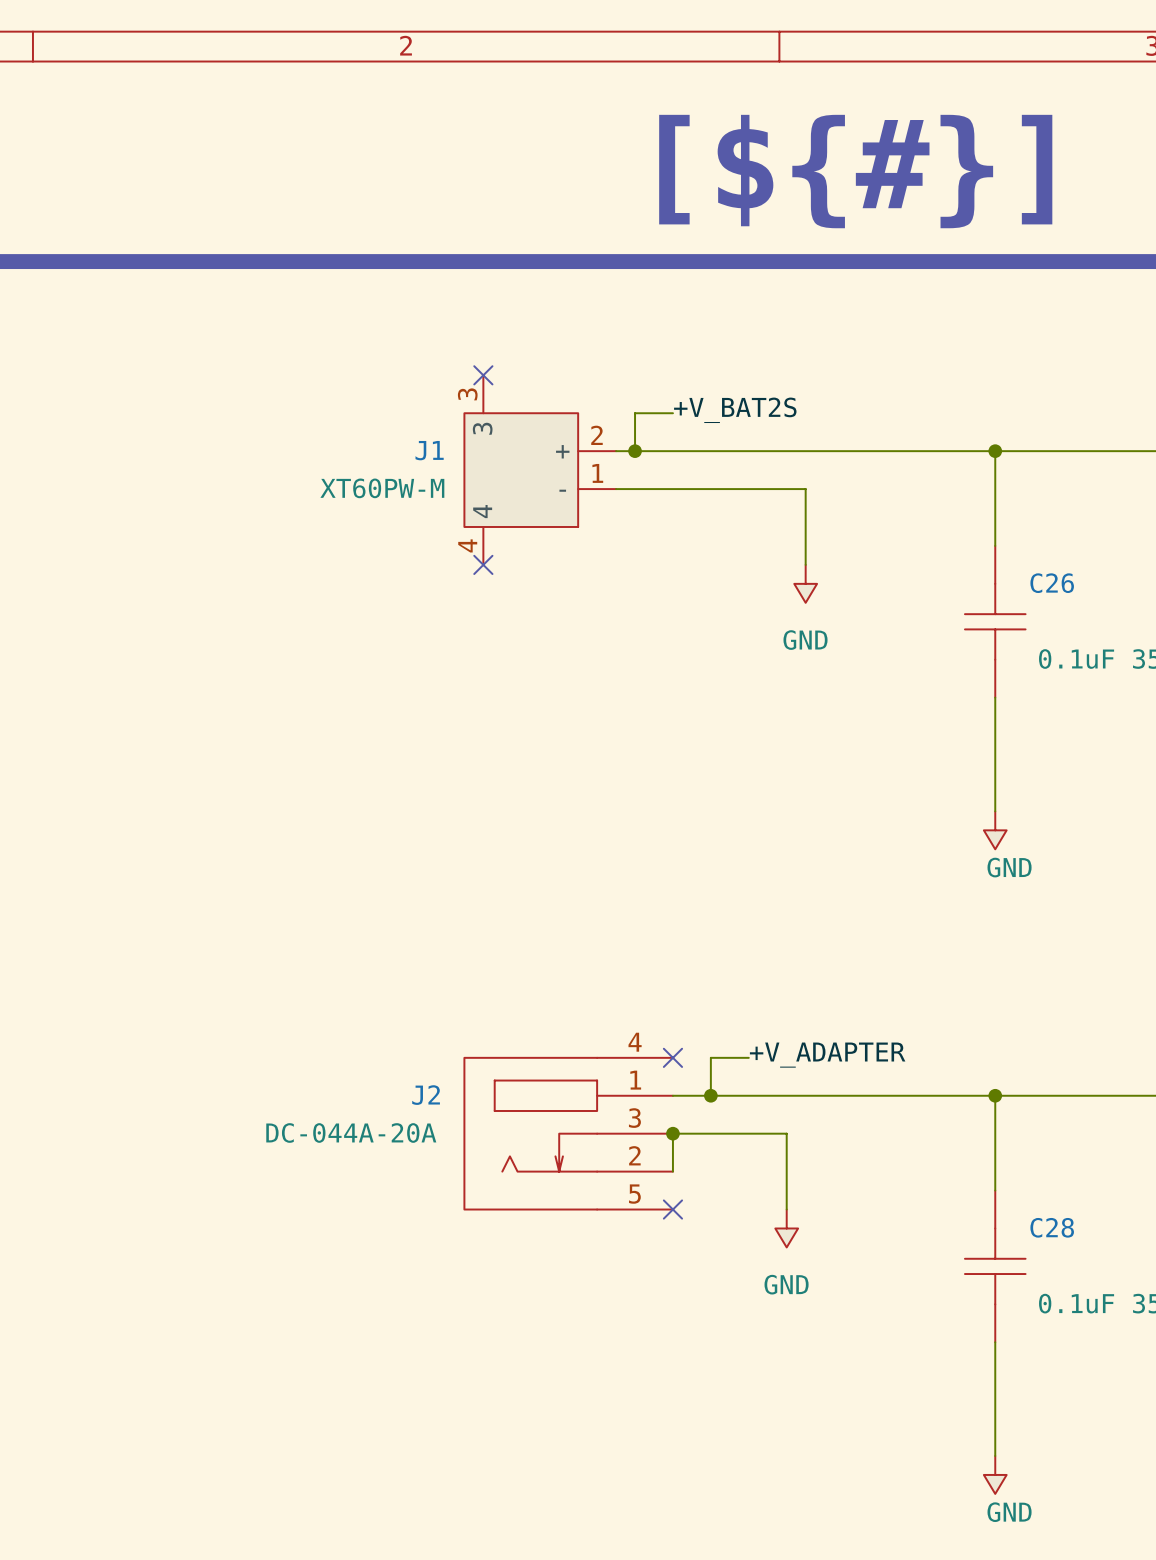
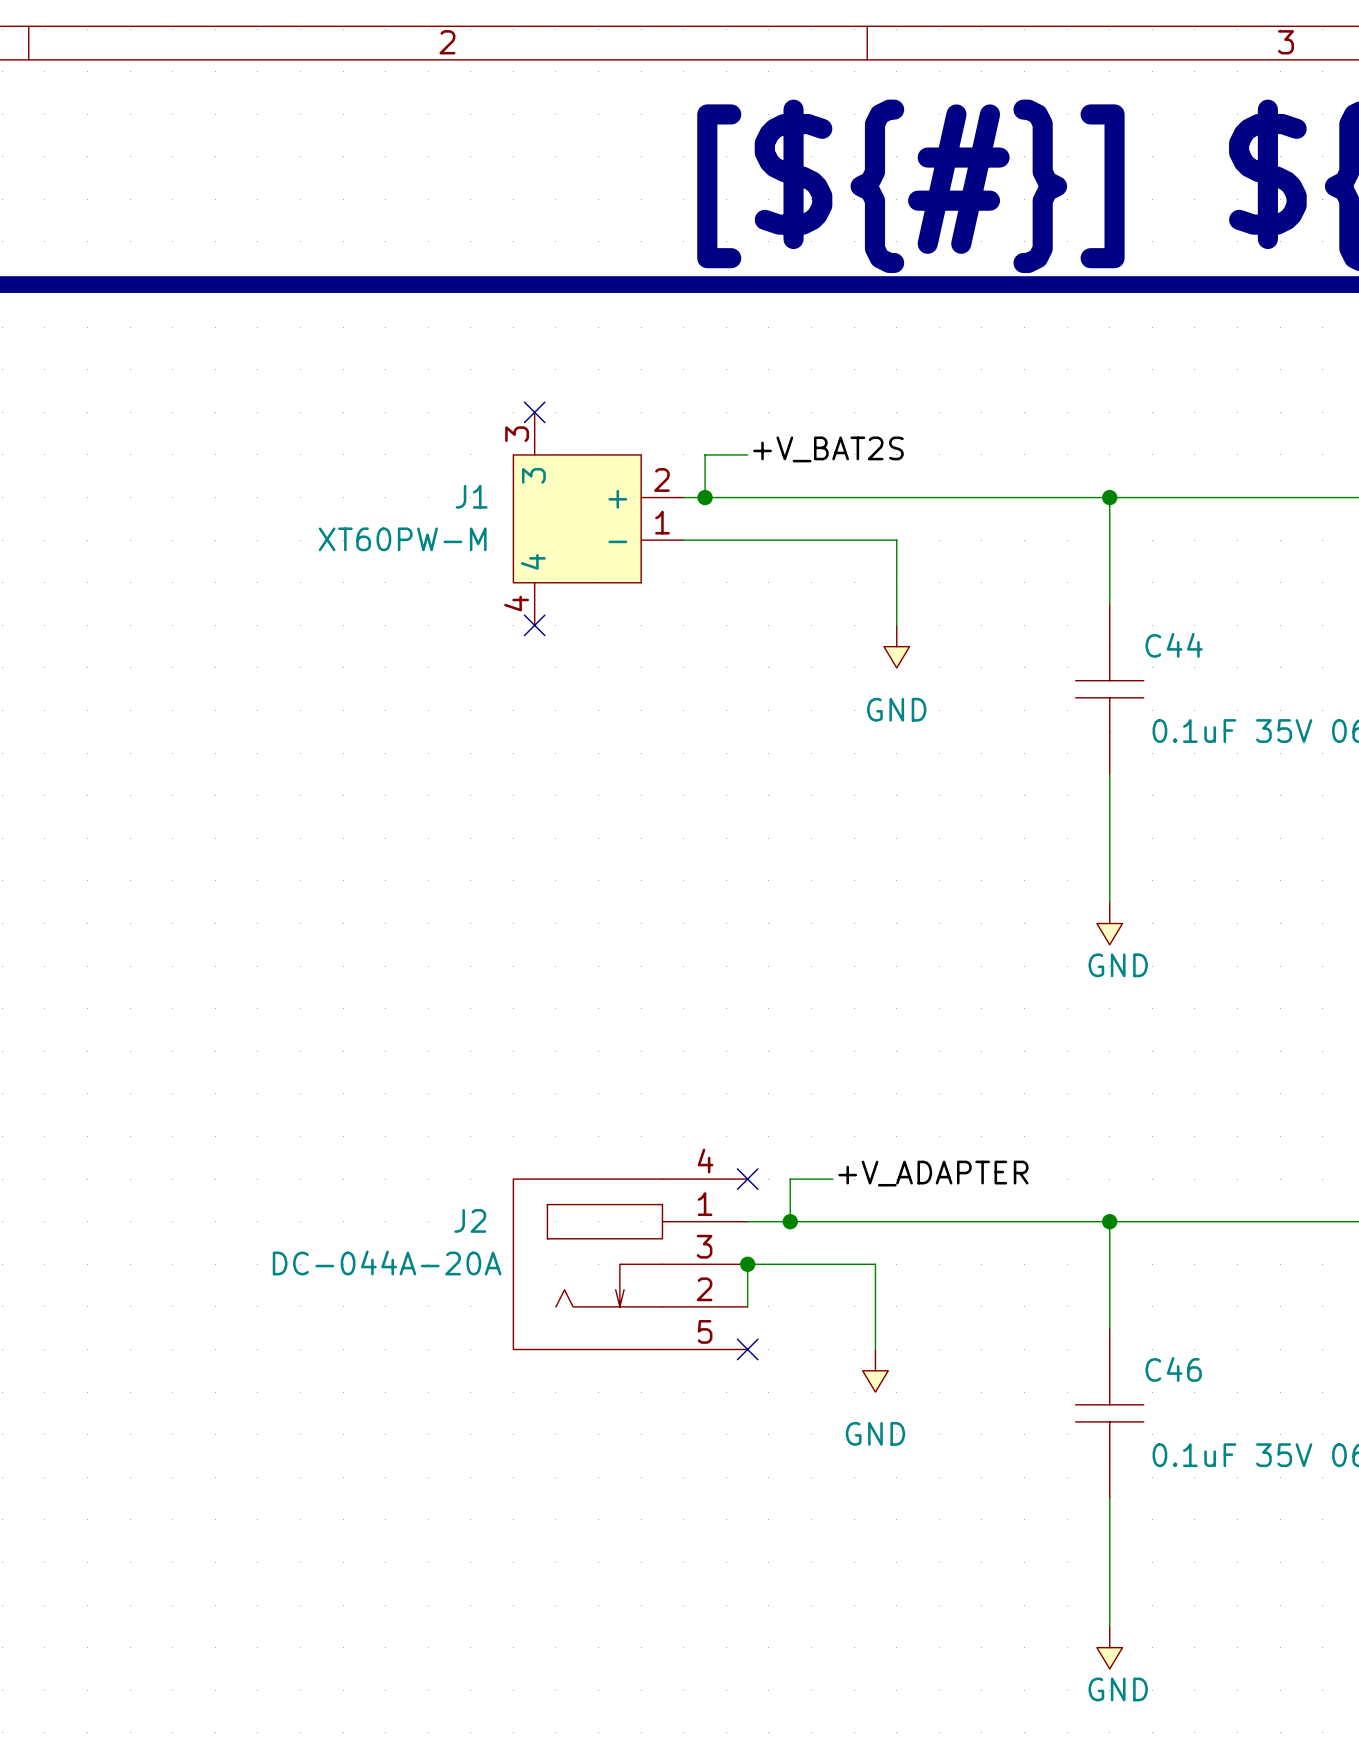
C26 name: C26 (1052, 583) -> C44 (1174, 645)
C28 name: C28 (1052, 1227) -> C46 (1173, 1369)

